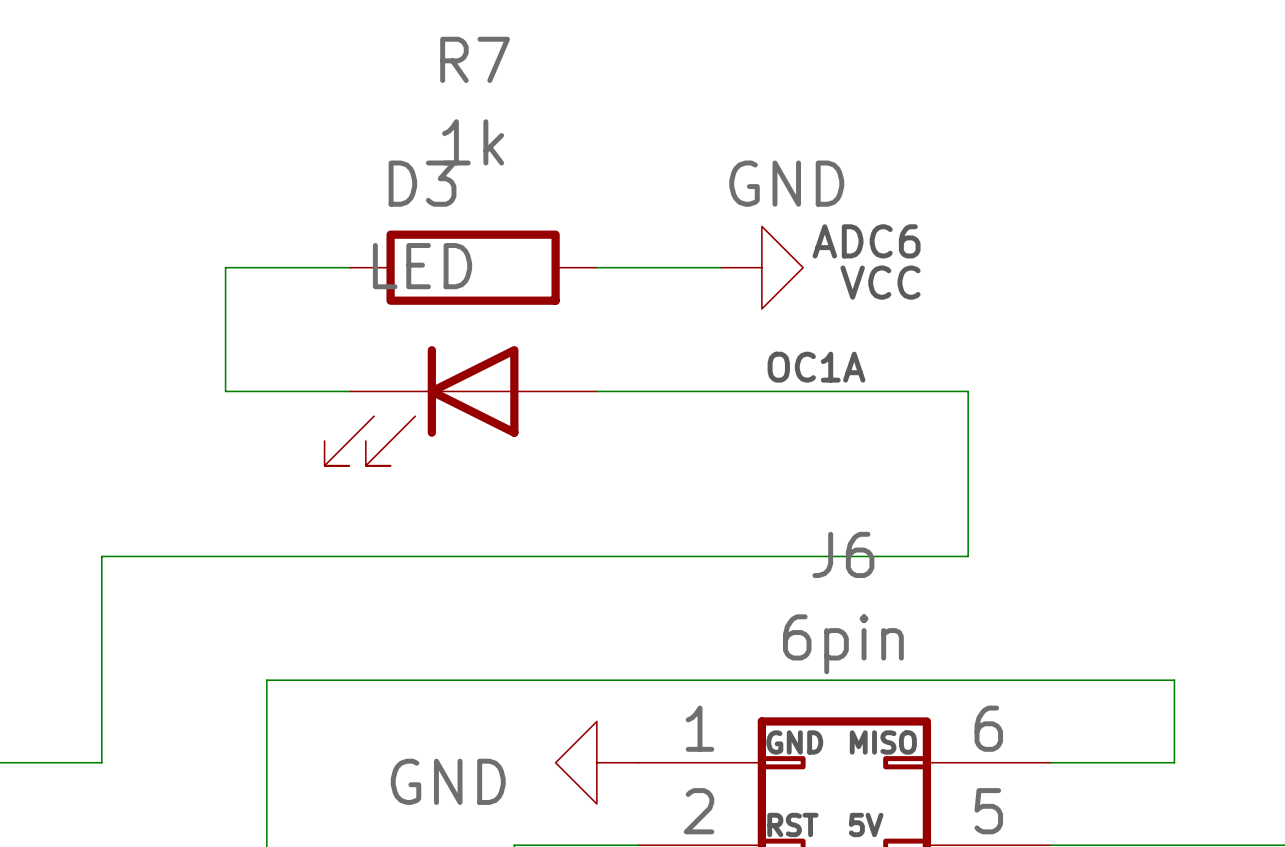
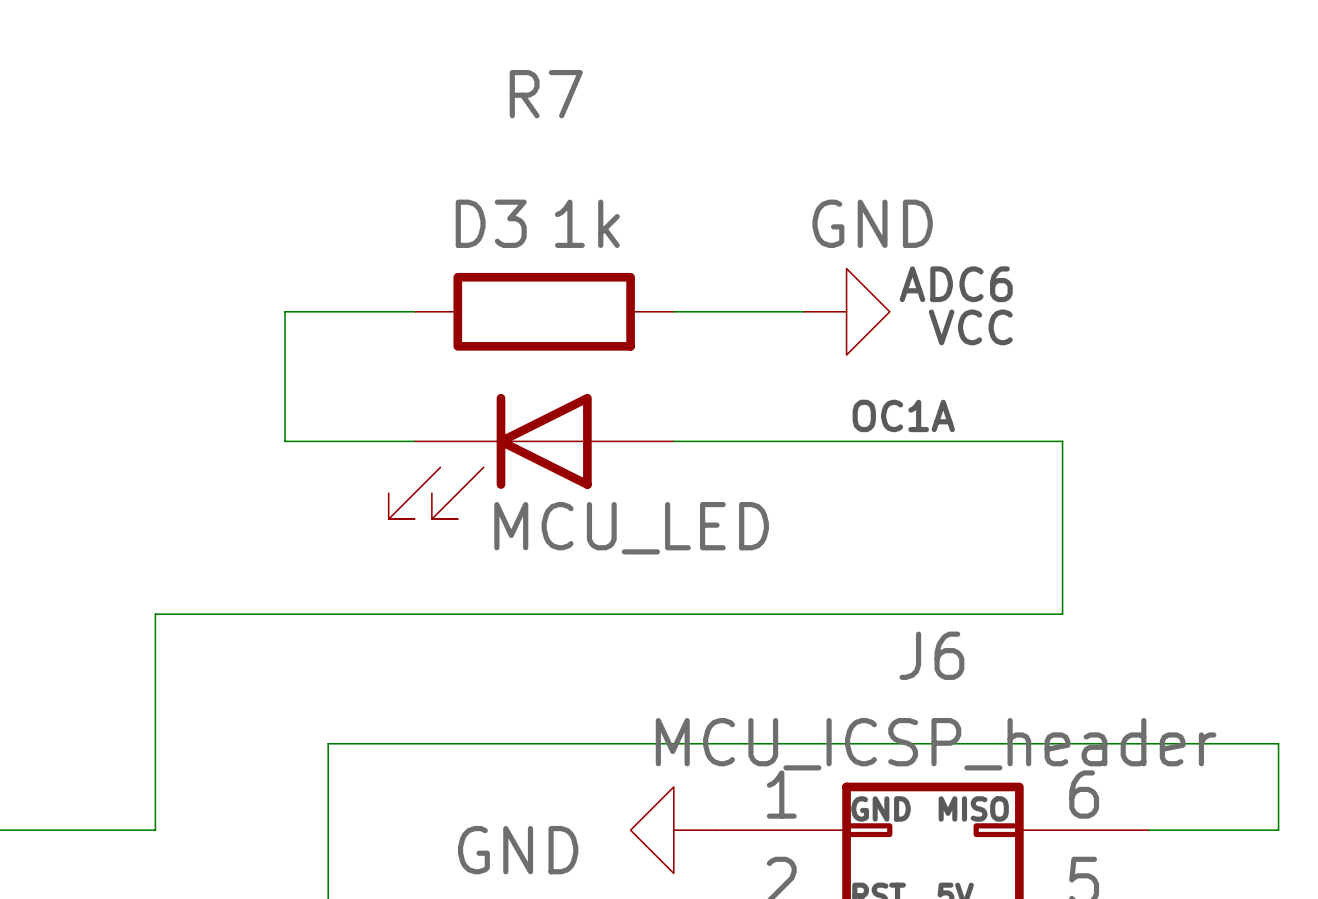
R7 value position: 1k (473, 142) -> 1k (587, 223)
D3 value: LED (422, 266) -> MCU_LED (631, 528)
J6 name position: J6 (843, 554) -> J6 (931, 655)
J6 value: 6pin (843, 644) -> MCU_ICSP_header (936, 744)

